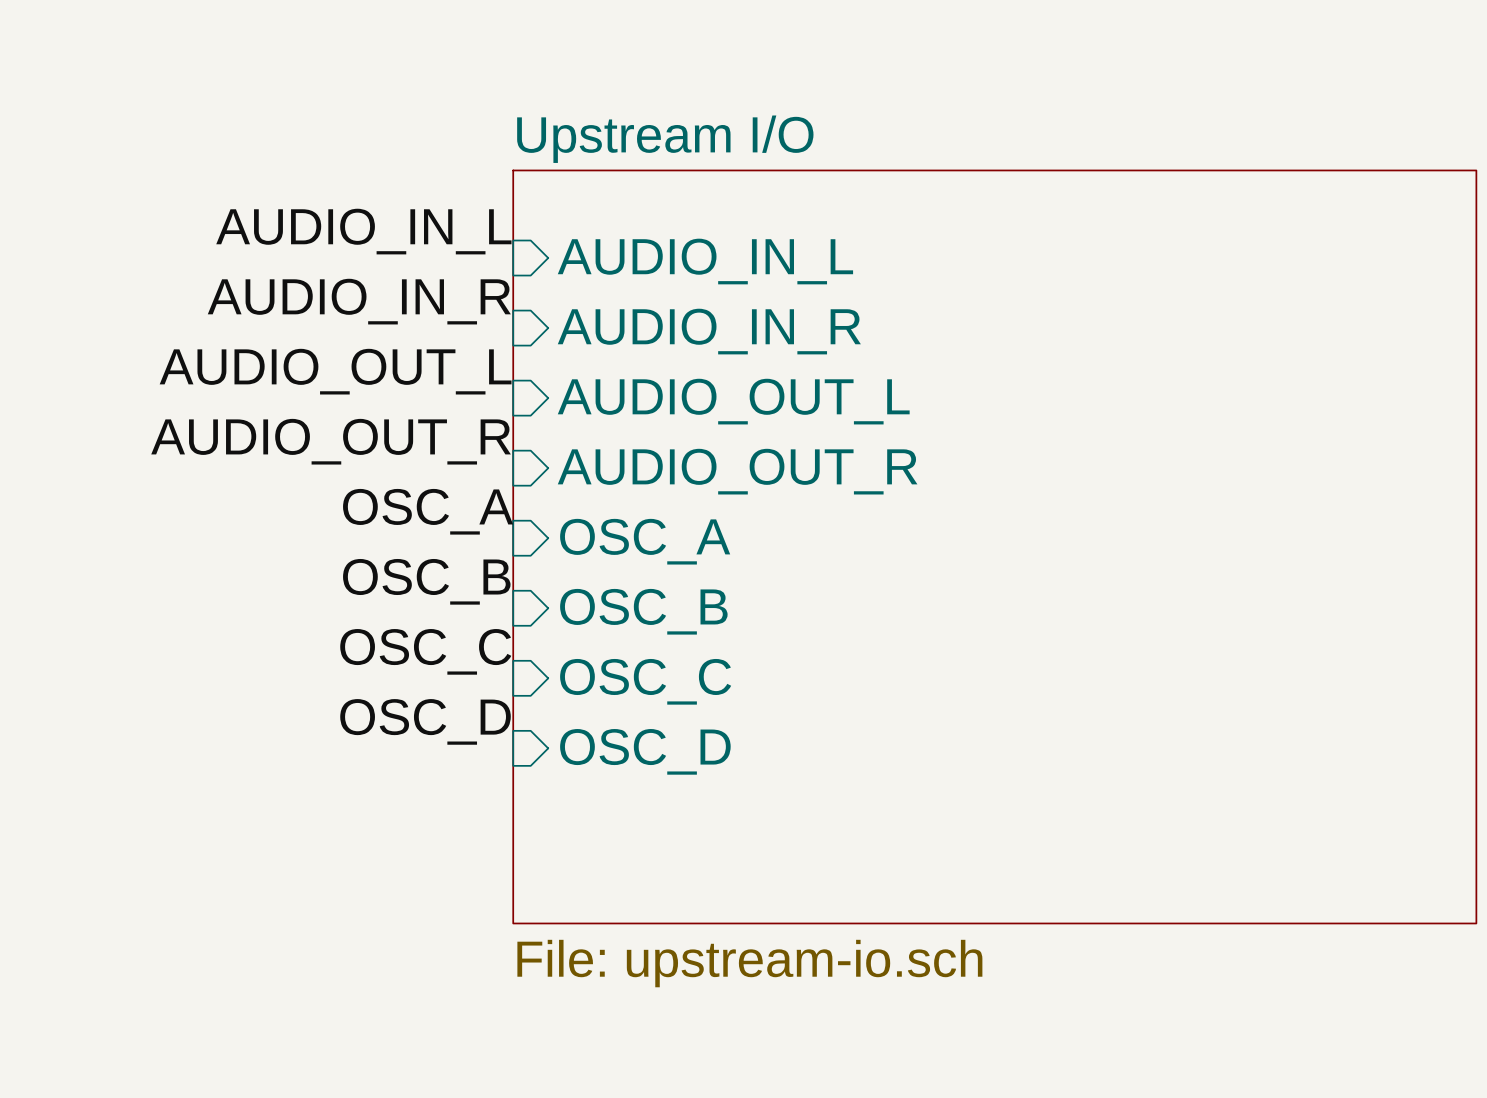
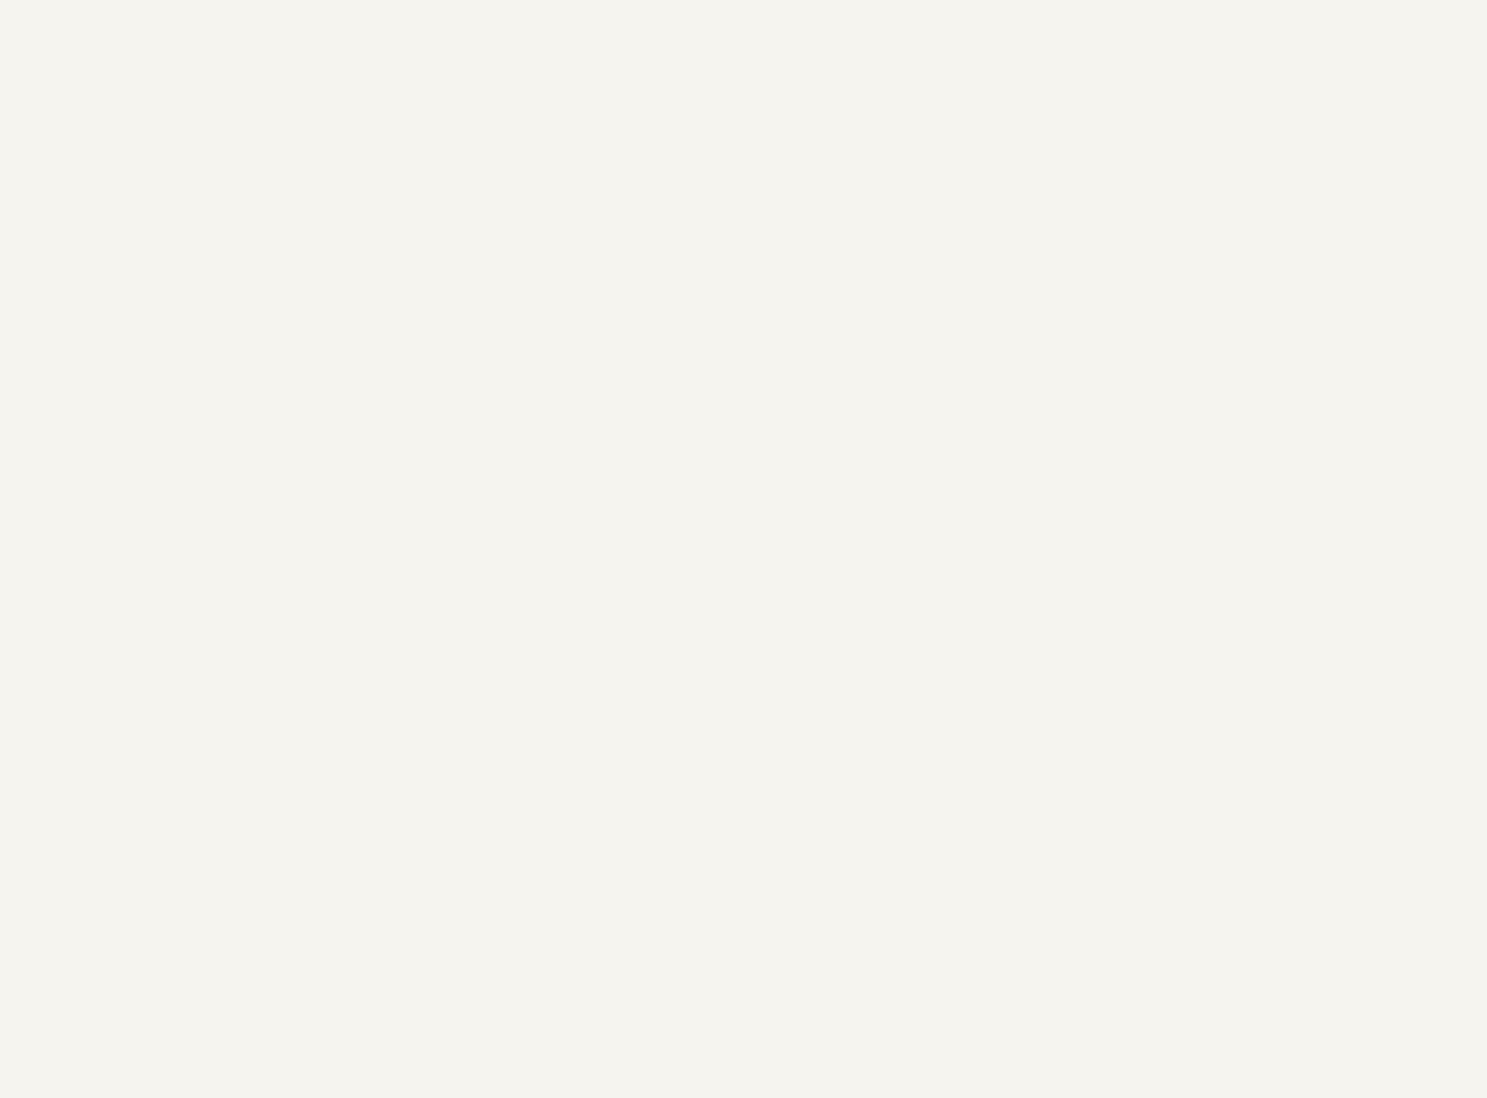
label: AUDIO_IN_L (363, 231) -> none
sheet pin: AUDIO_IN_L (705, 261) -> none
label: AUDIO_IN_R (359, 301) -> none
sheet pin: AUDIO_IN_R (709, 331) -> none
label: AUDIO_OUT_L (335, 371) -> none
sheet pin: AUDIO_OUT_L (733, 401) -> none
label: AUDIO_OUT_R (331, 441) -> none
sheet pin: AUDIO_OUT_R (737, 471) -> none
label: OSC_A (428, 511) -> none
sheet pin: OSC_A (645, 541) -> none
sheet Upstream I/O: File: upstream-io.sch (994, 546) -> none
label: OSC_B (426, 581) -> none
sheet pin: OSC_B (643, 611) -> none
label: OSC_C (425, 651) -> none
sheet pin: OSC_C (645, 681) -> none
label: OSC_D (425, 721) -> none
sheet pin: OSC_D (645, 751) -> none

